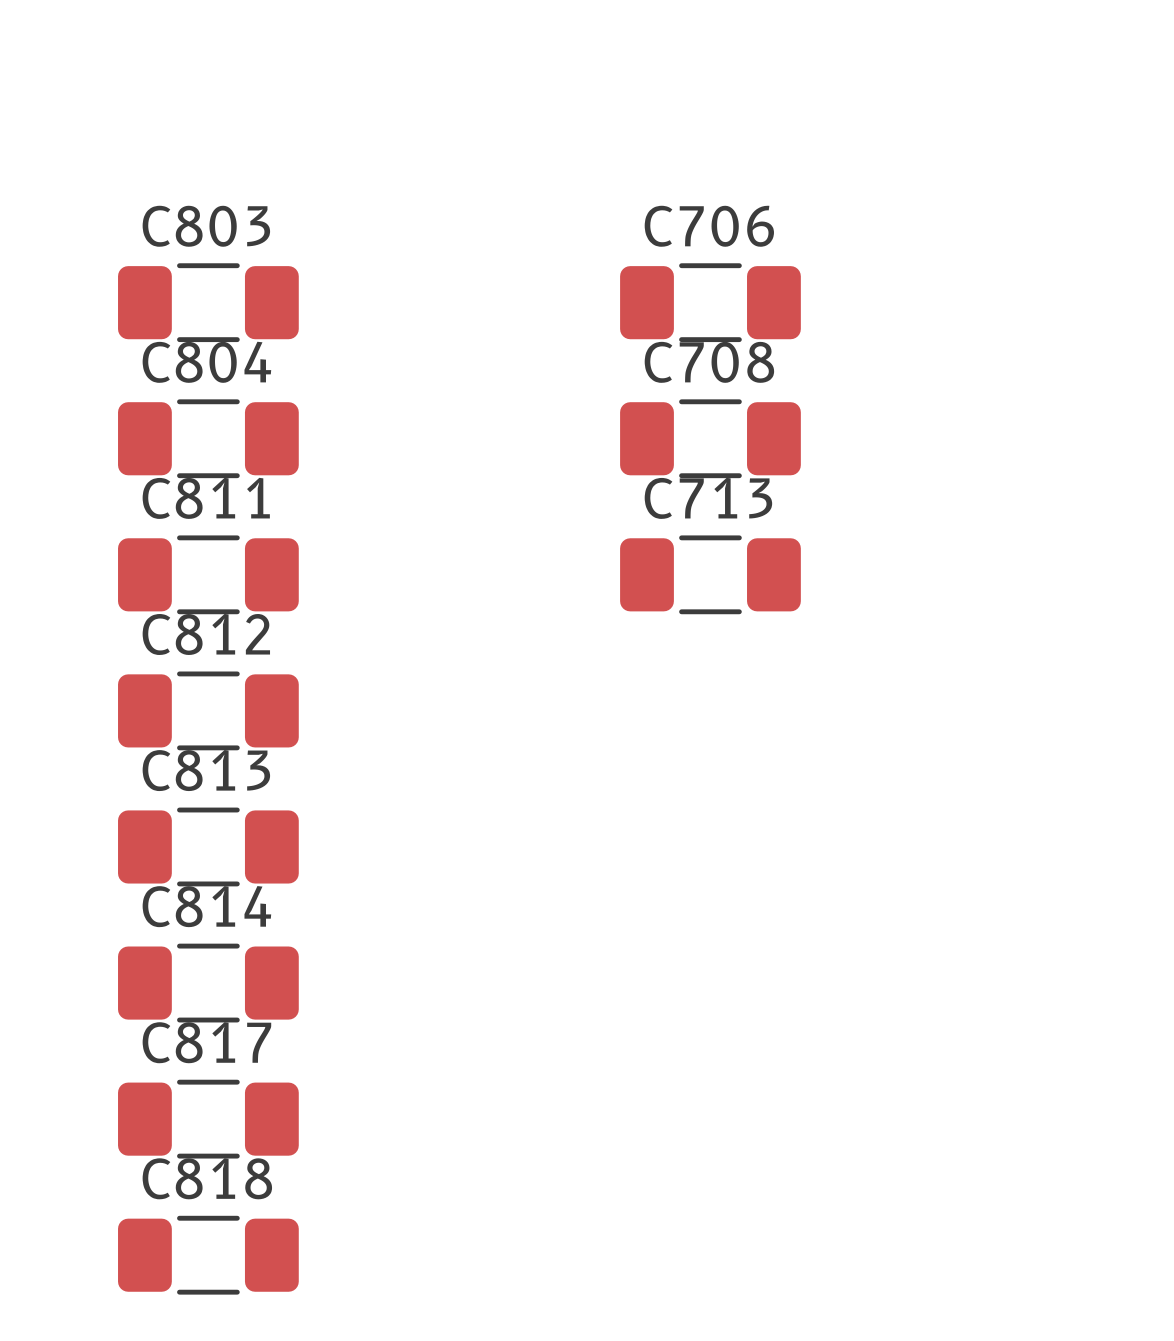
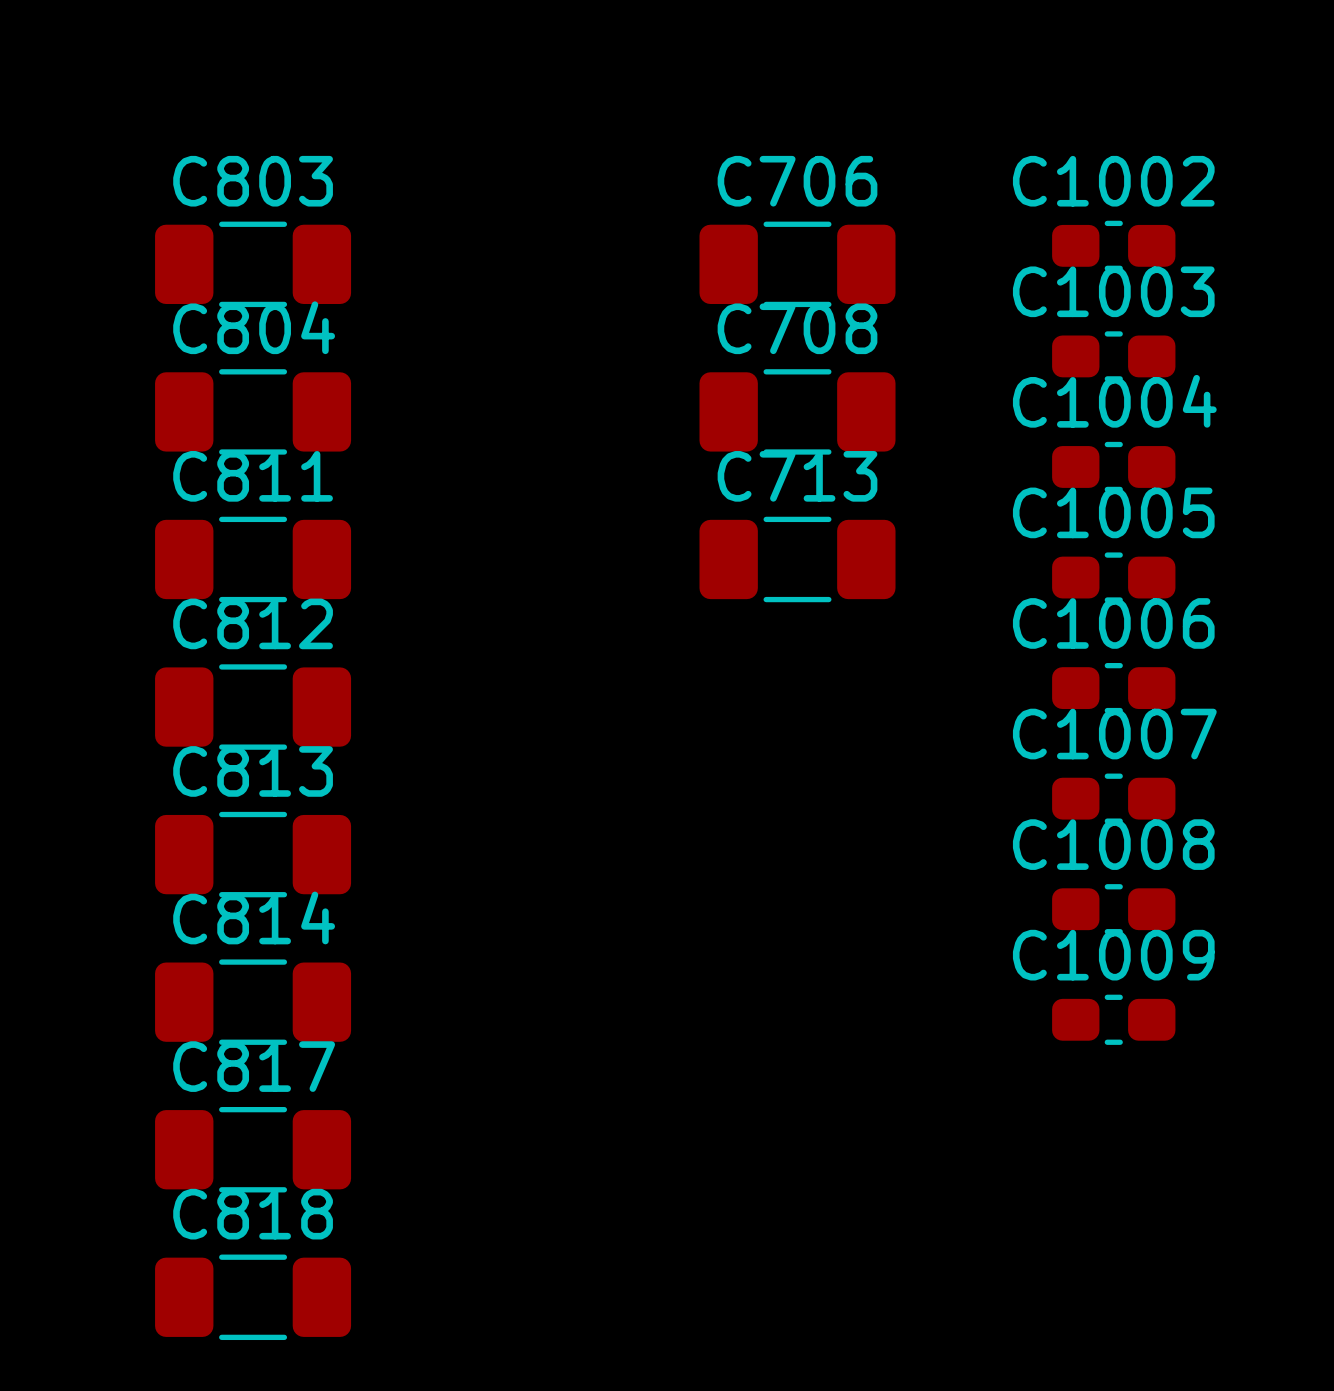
C1002: none -> (1113, 245)
C1003: none -> (1113, 356)
C1004: none -> (1113, 466)
C1005: none -> (1113, 577)
C1006: none -> (1113, 688)
C1007: none -> (1113, 798)
C1008: none -> (1113, 909)
C1009: none -> (1113, 1019)

